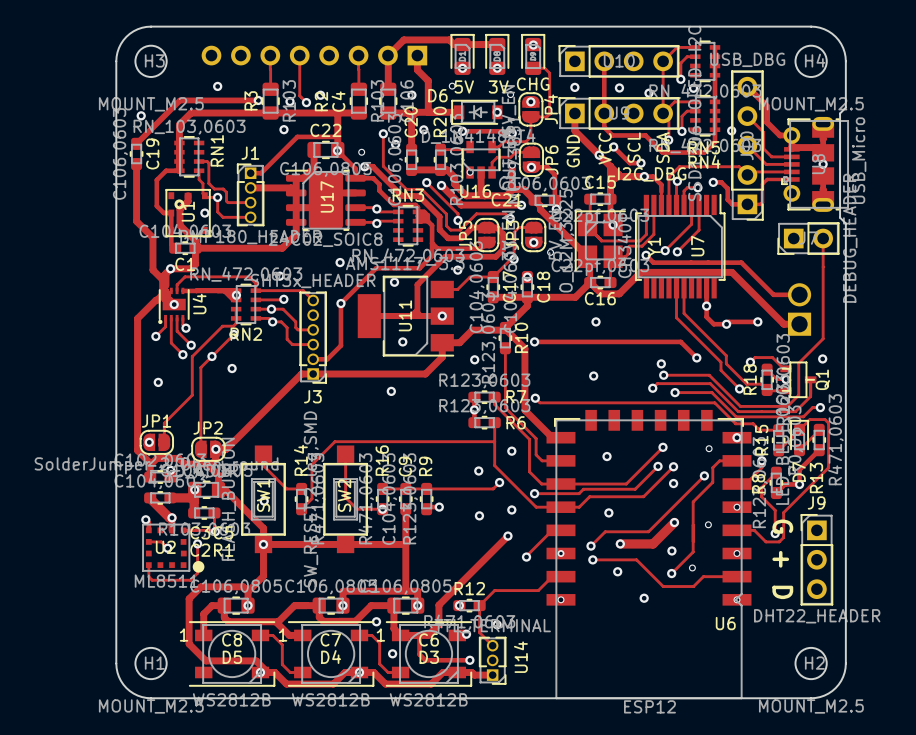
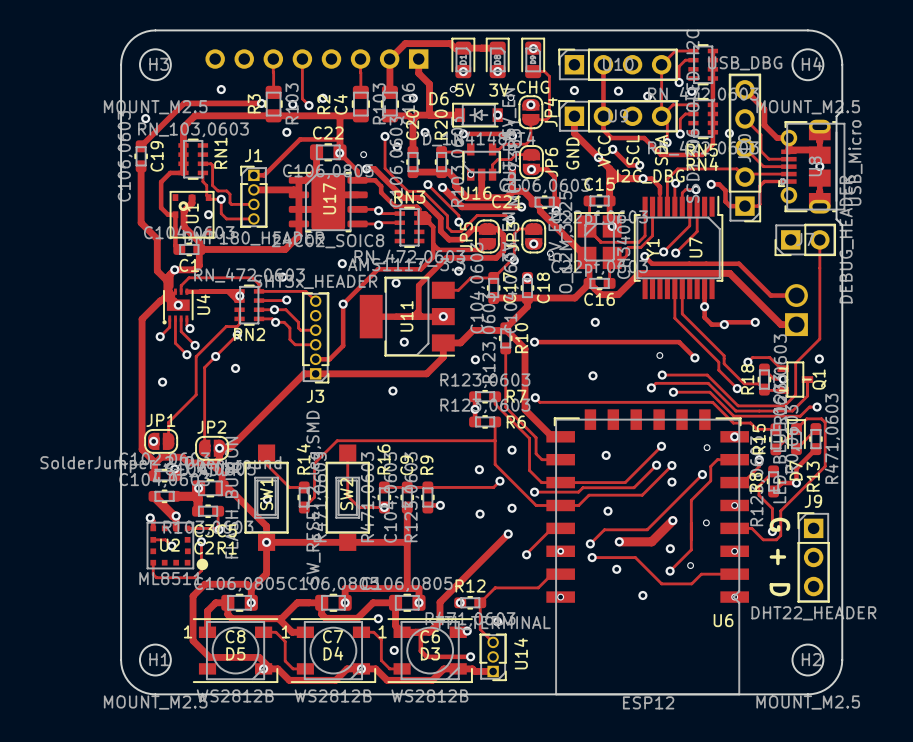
via: none -> (659, 355)
via: (661, 363) -> none

